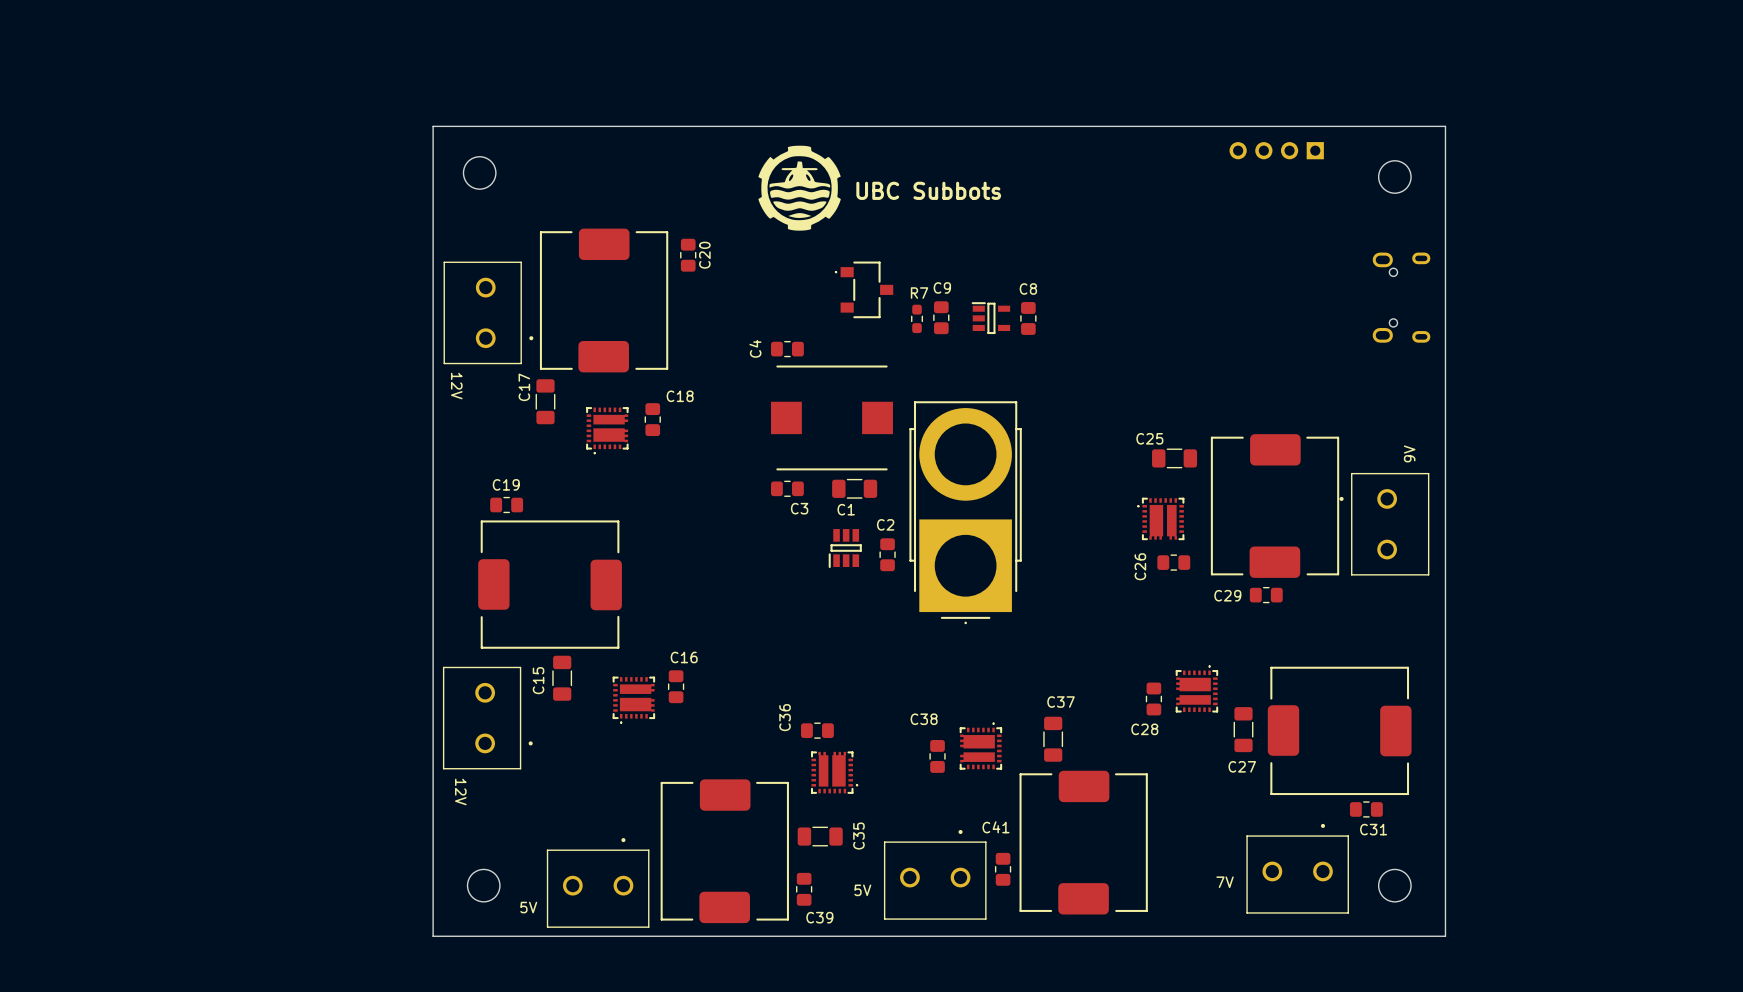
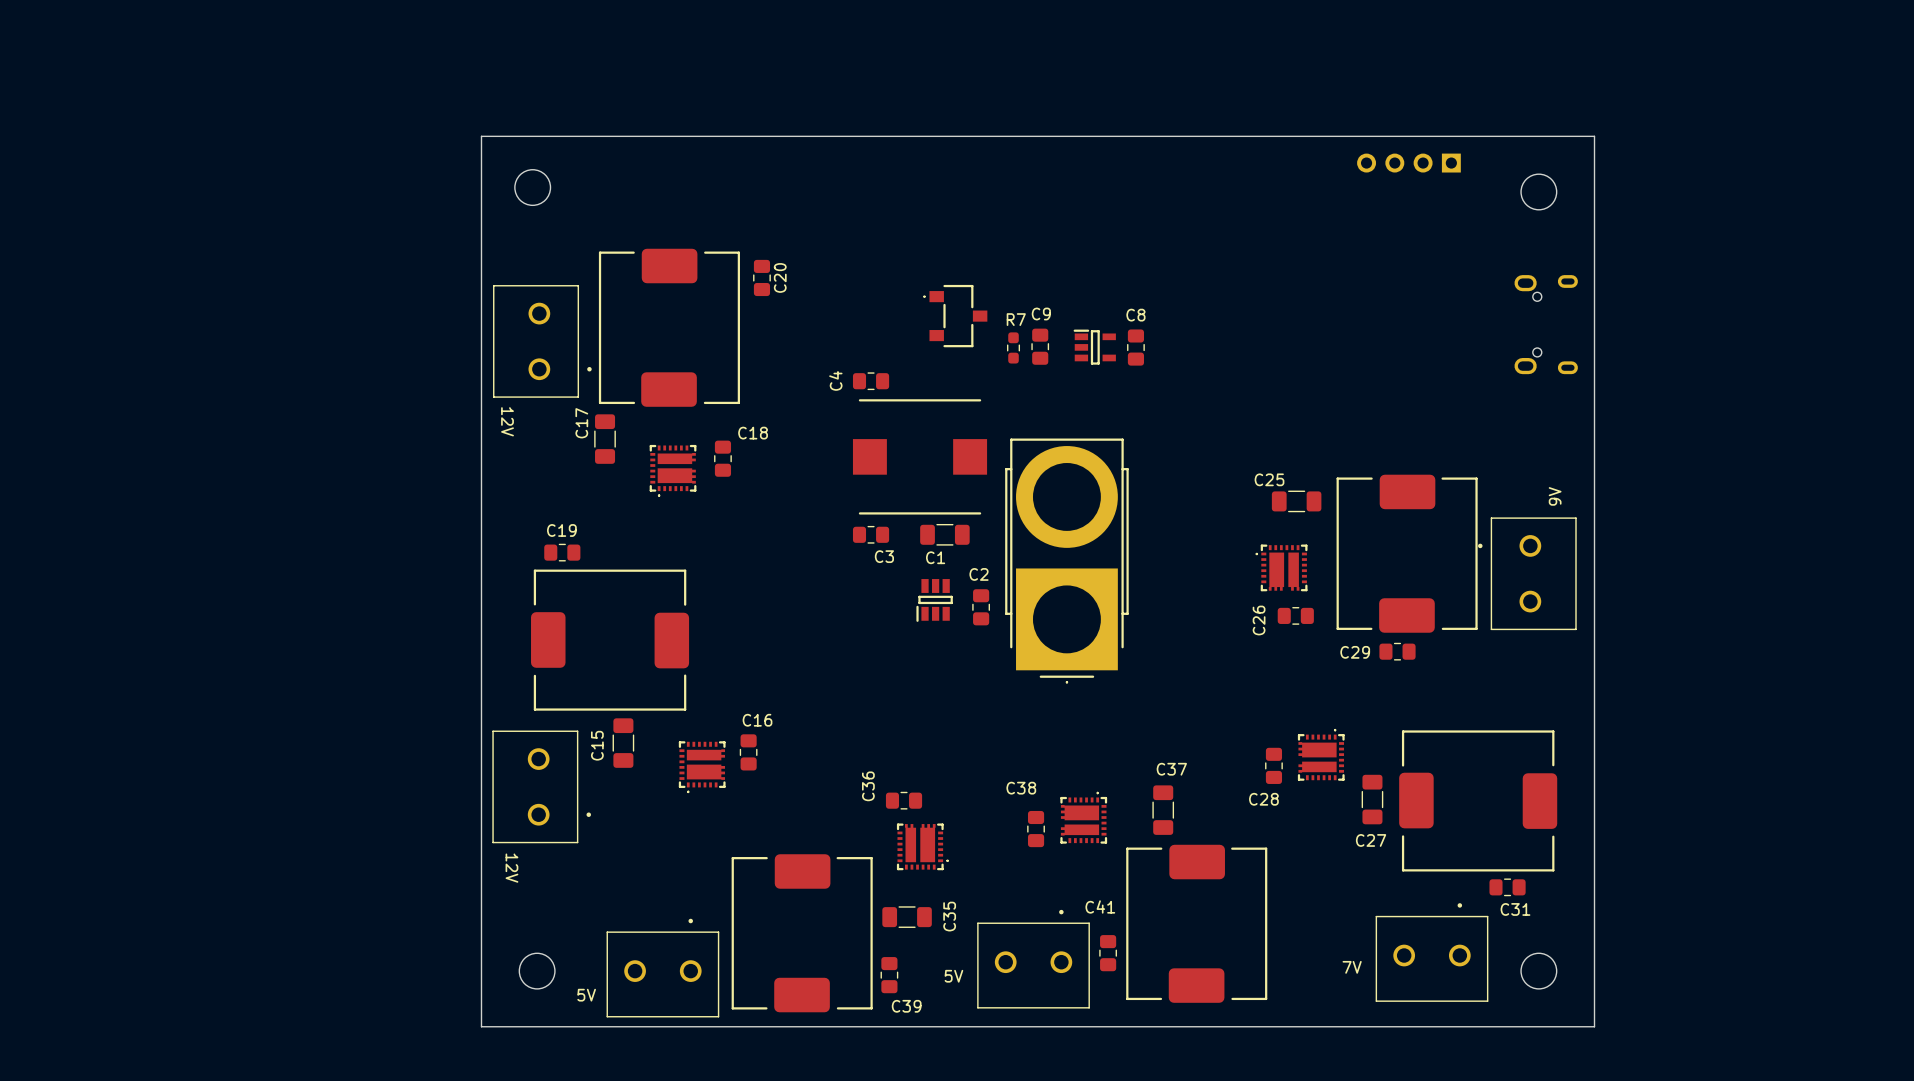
drawing: [758, 145, 841, 231] -> none
text: UBC Subbots (928, 190) -> none

